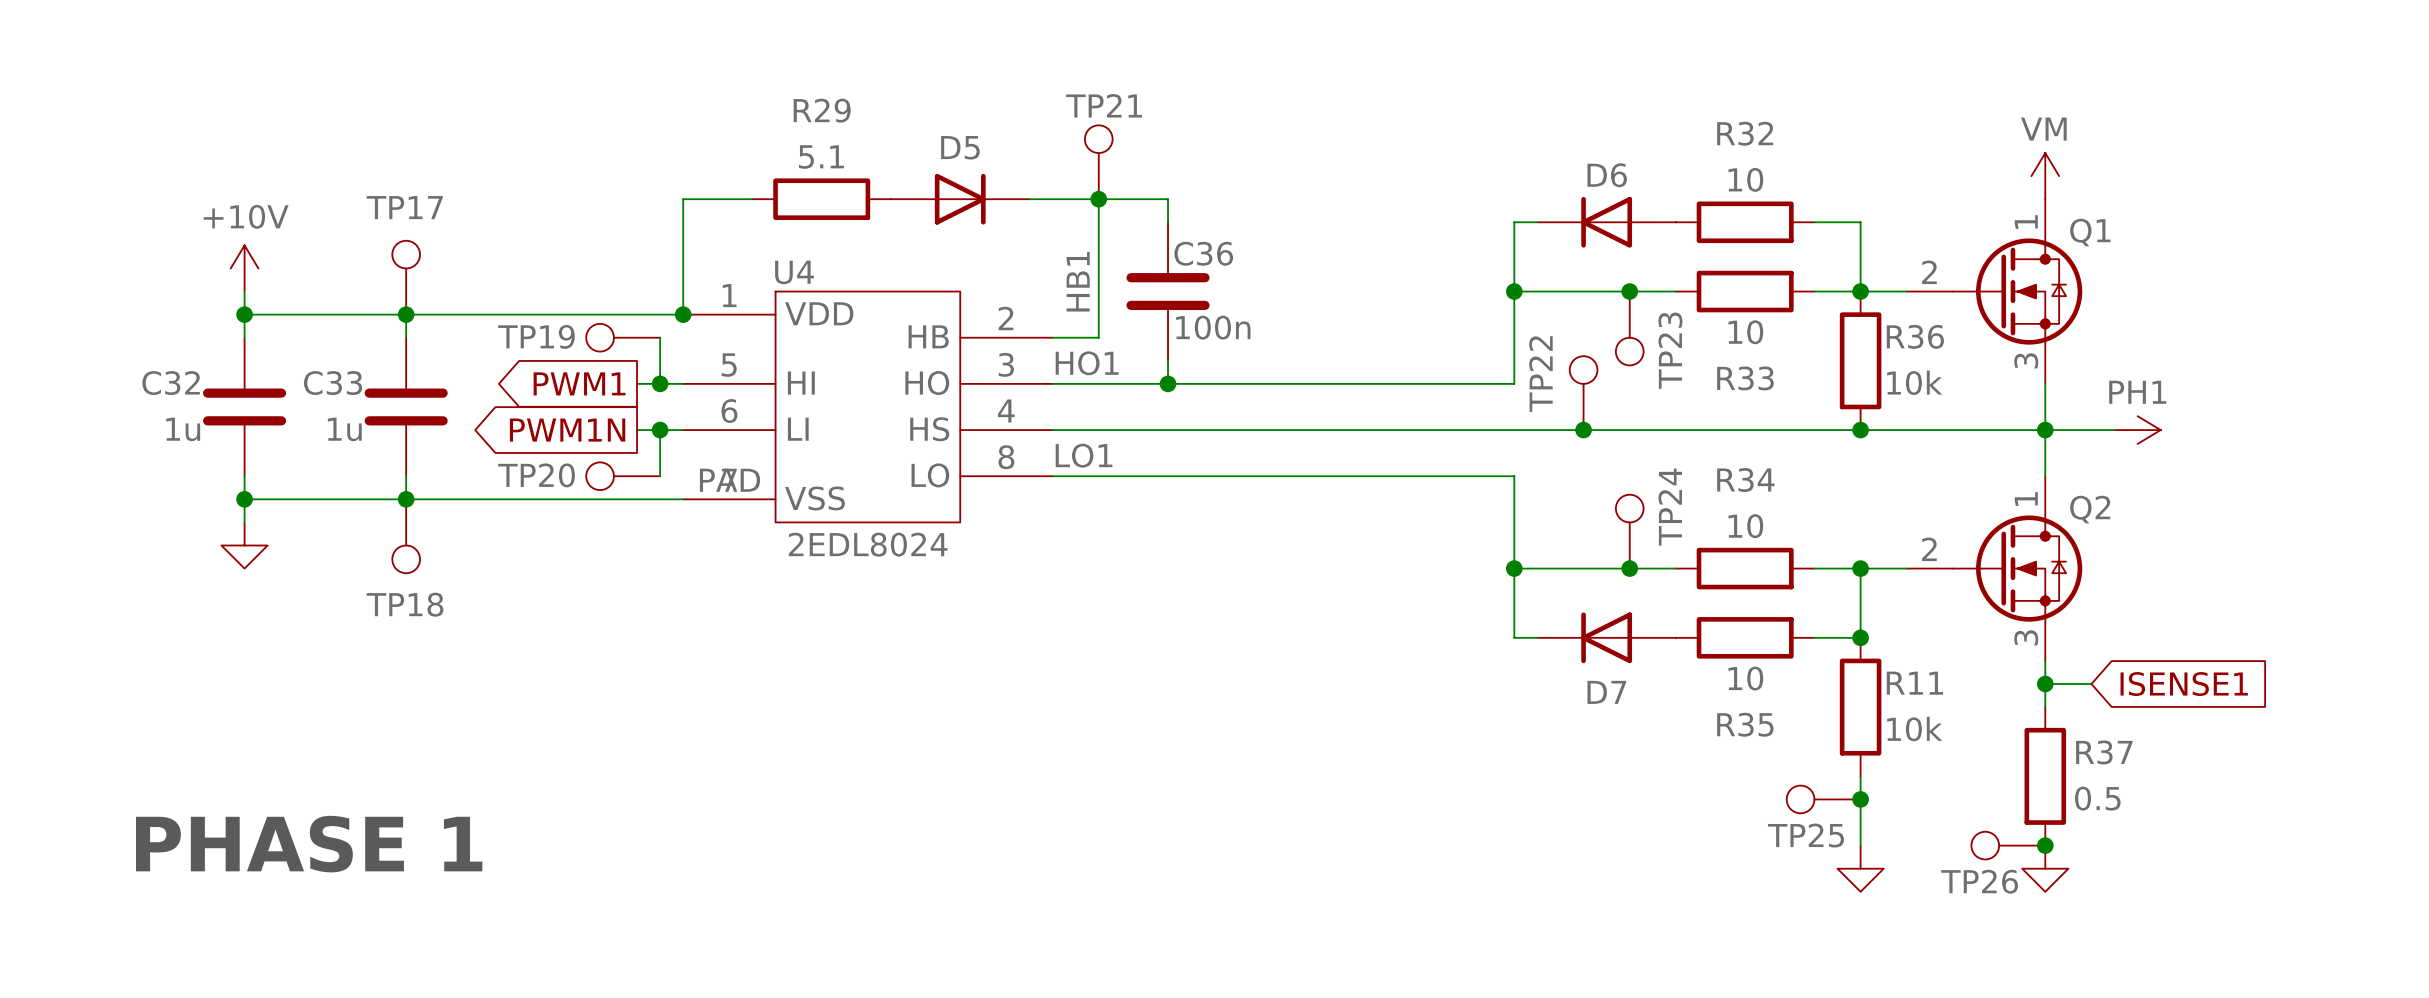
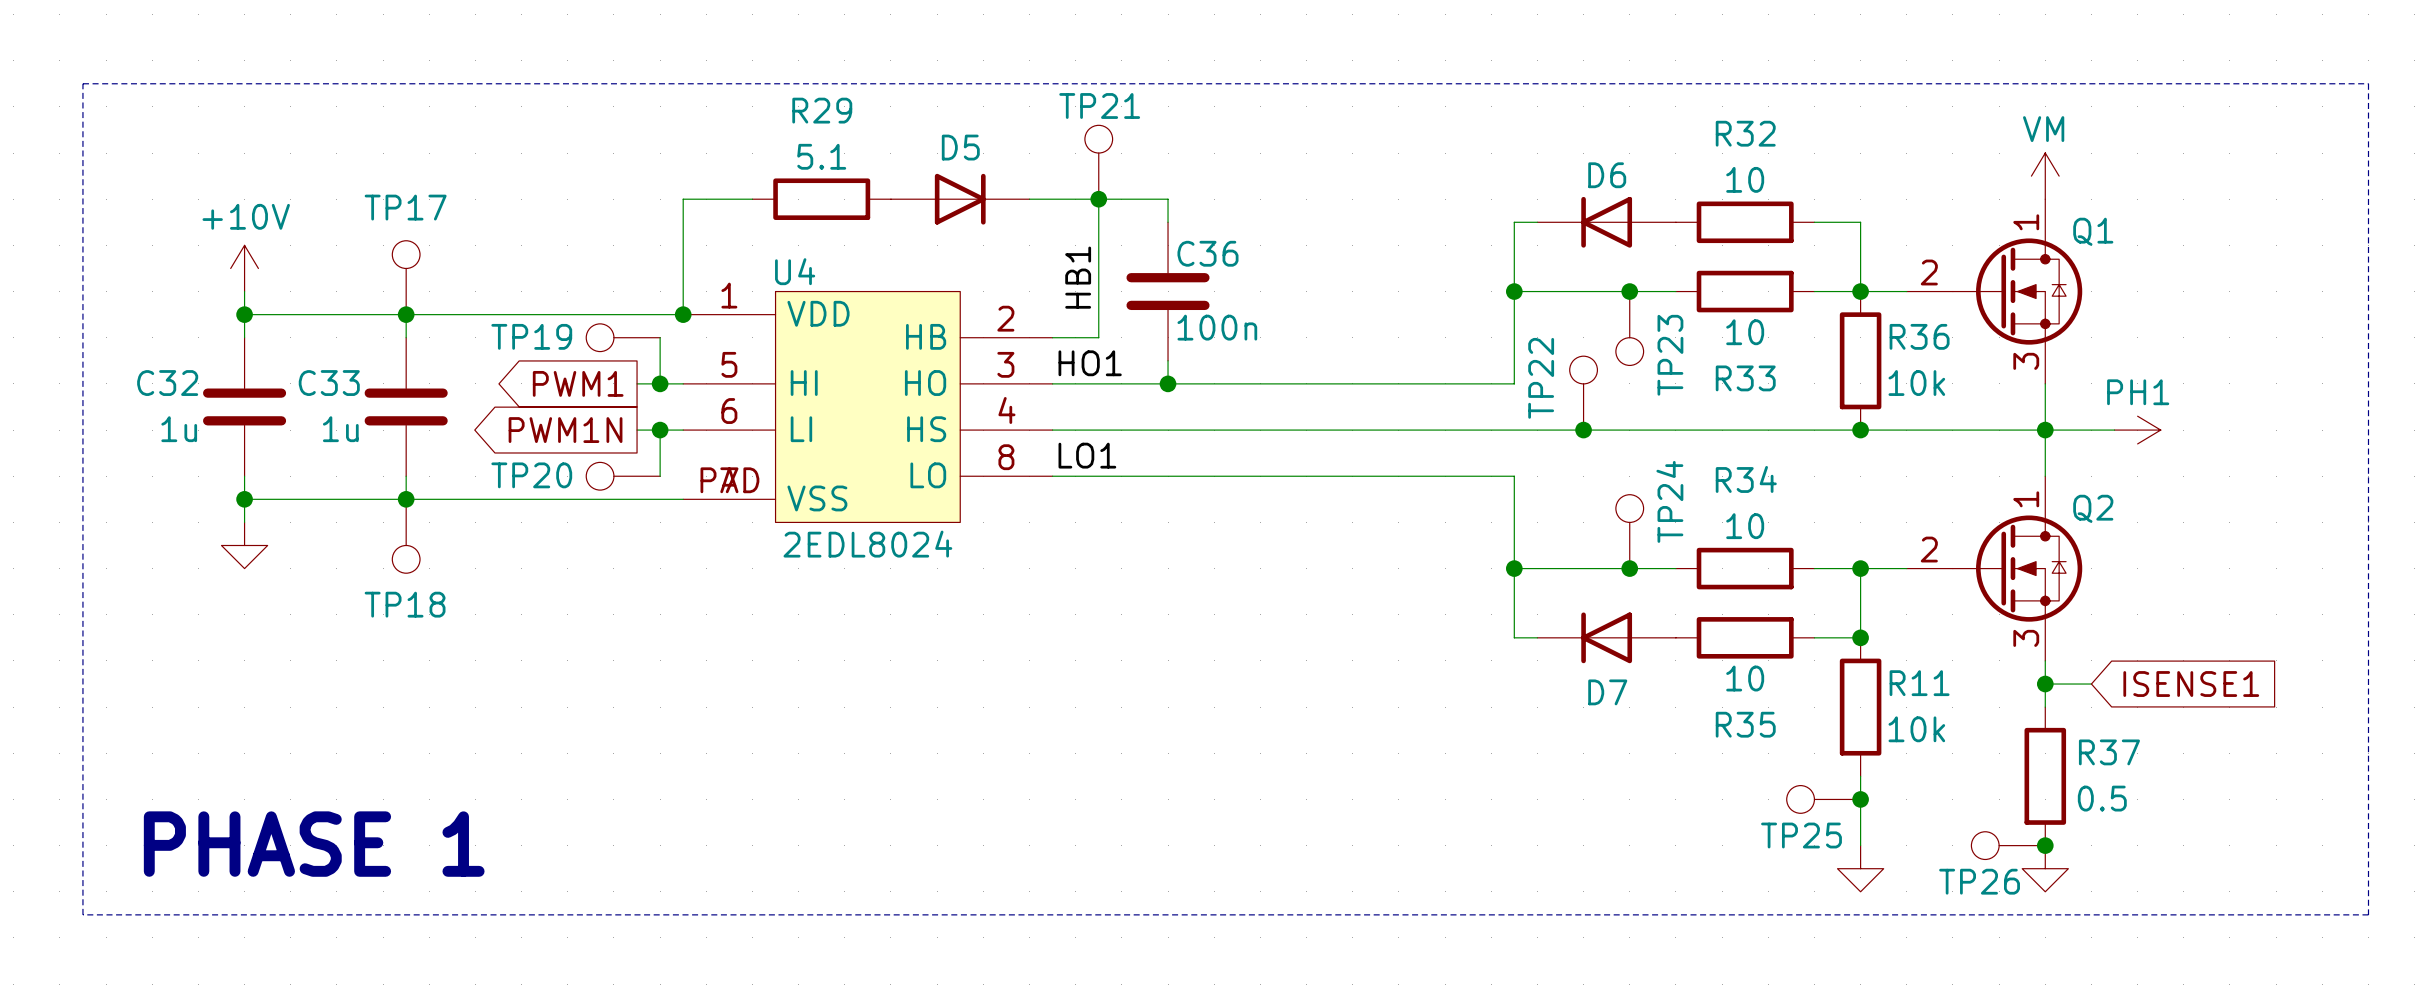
line: none -> (82, 83) (2368, 83) (2368, 914) (82, 914) (82, 83)

